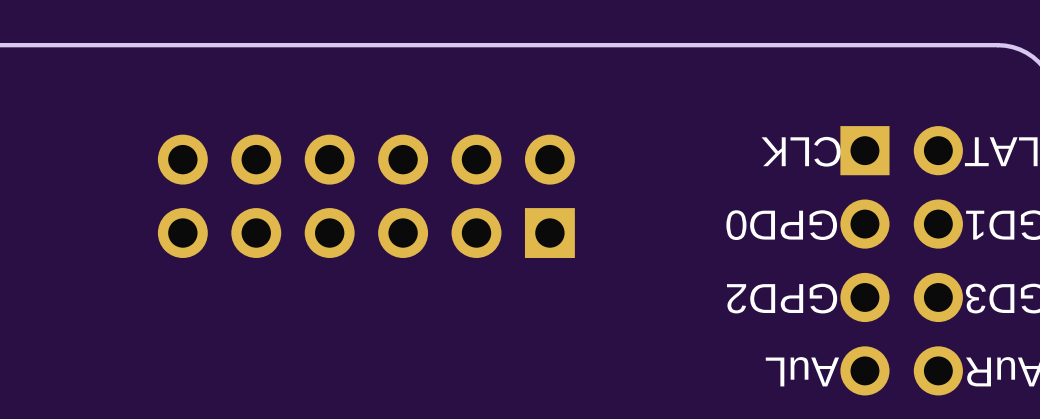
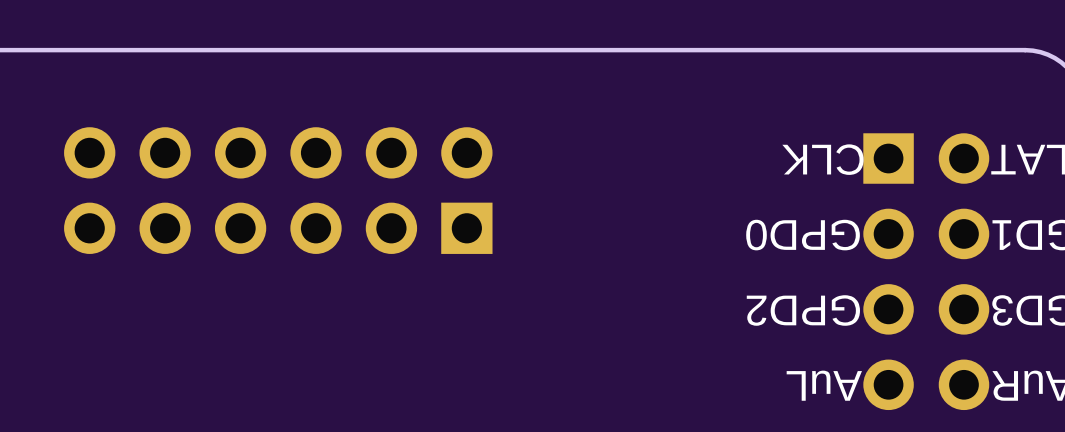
part position: (366, 196) -> (278, 190)

